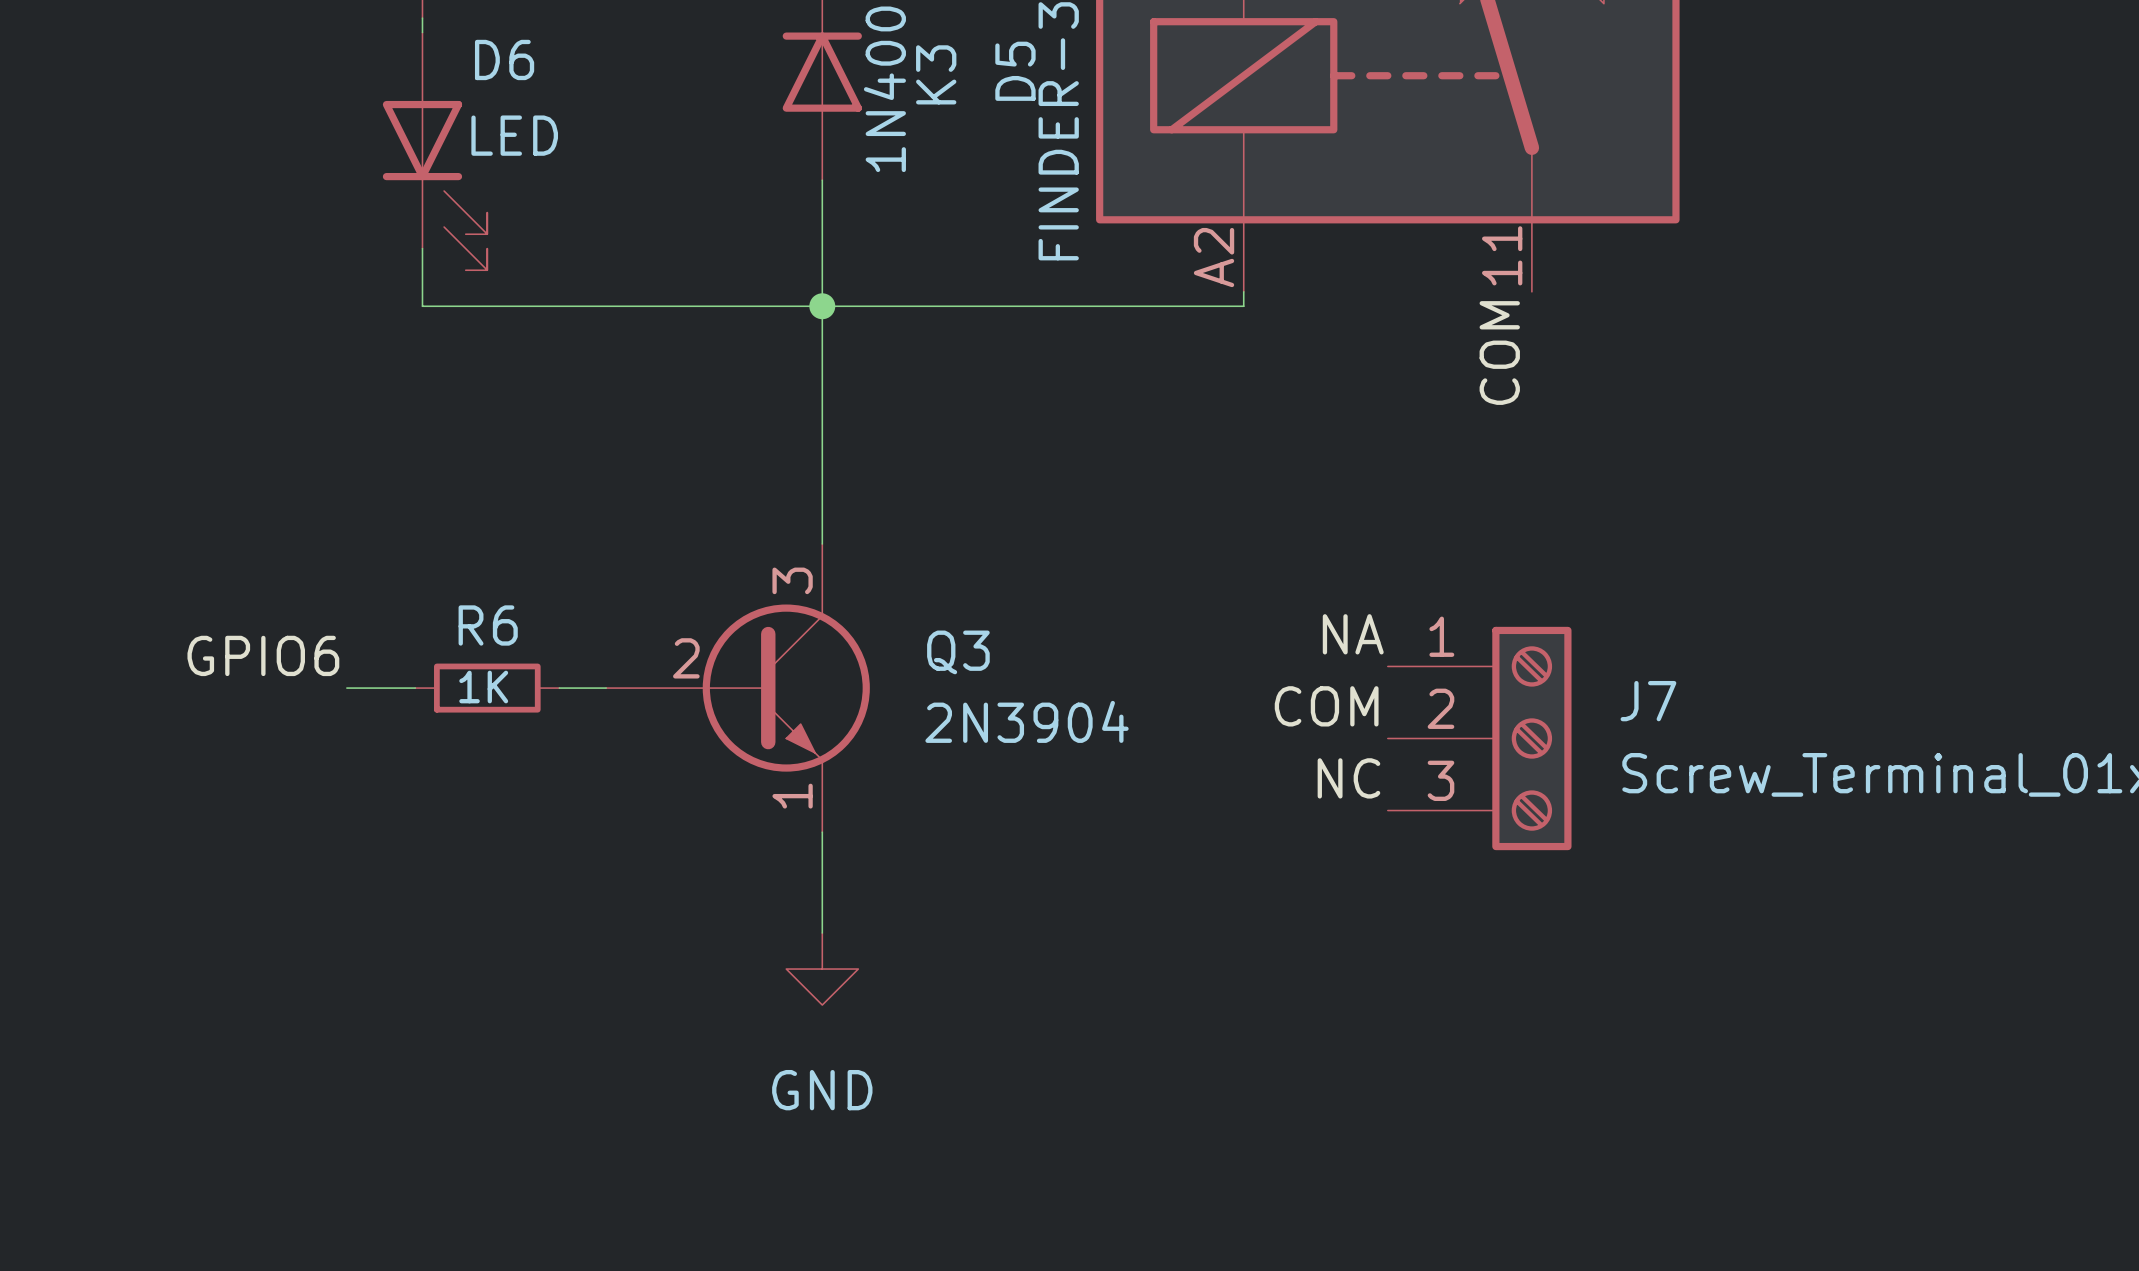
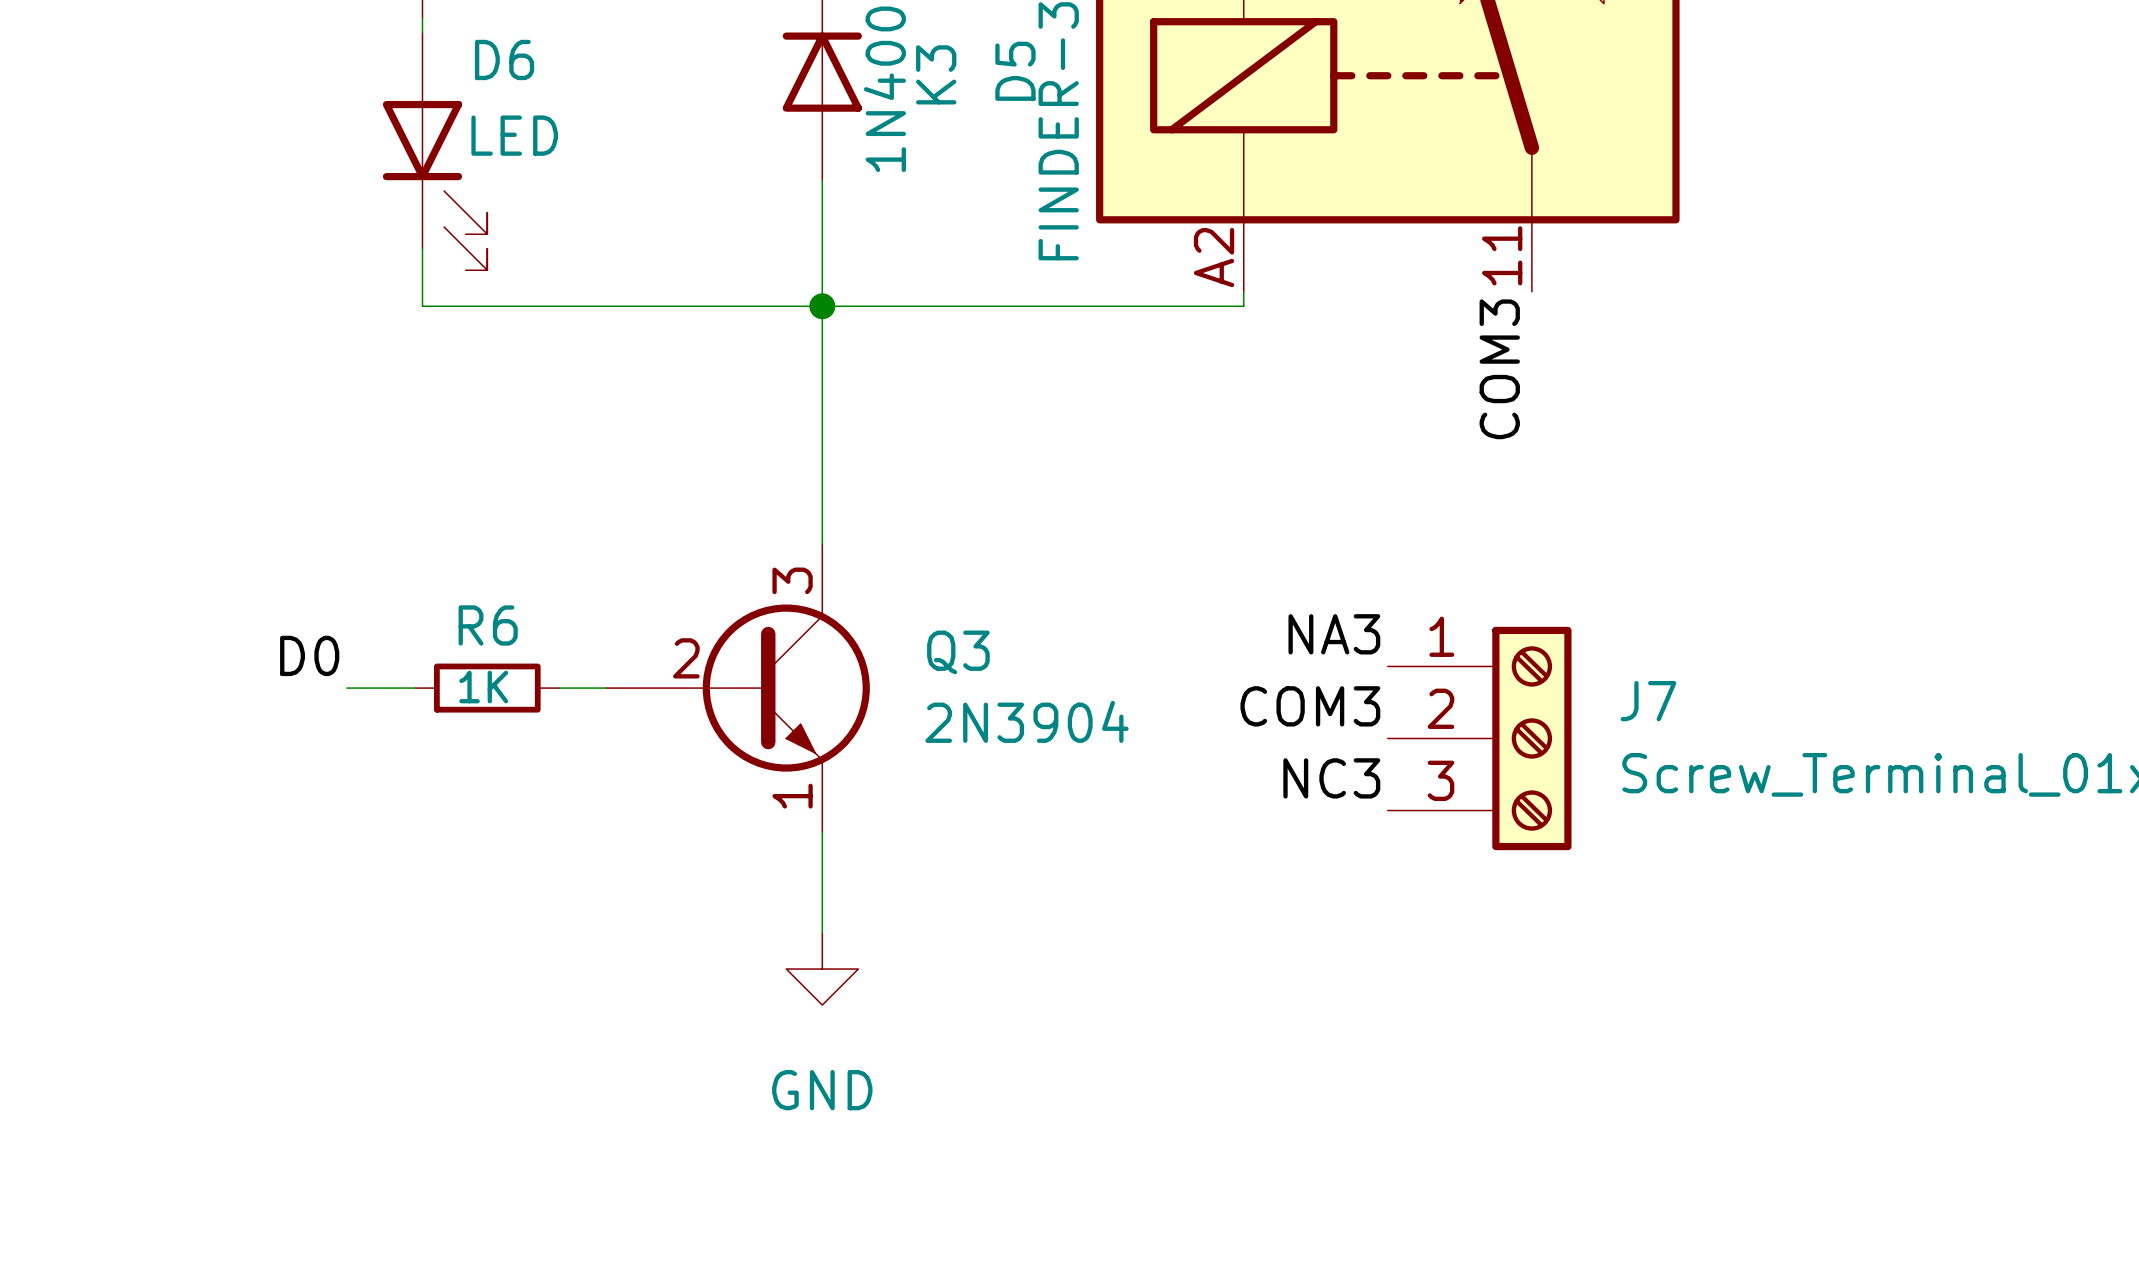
label: COM (1499, 353) -> COM3 (1499, 369)
label: NA (1353, 634) -> NA3 (1334, 634)
label: GPIO6 (263, 655) -> D0 (309, 655)
label: COM (1326, 706) -> COM3 (1310, 706)
label: NC (1348, 778) -> NC3 (1331, 778)

